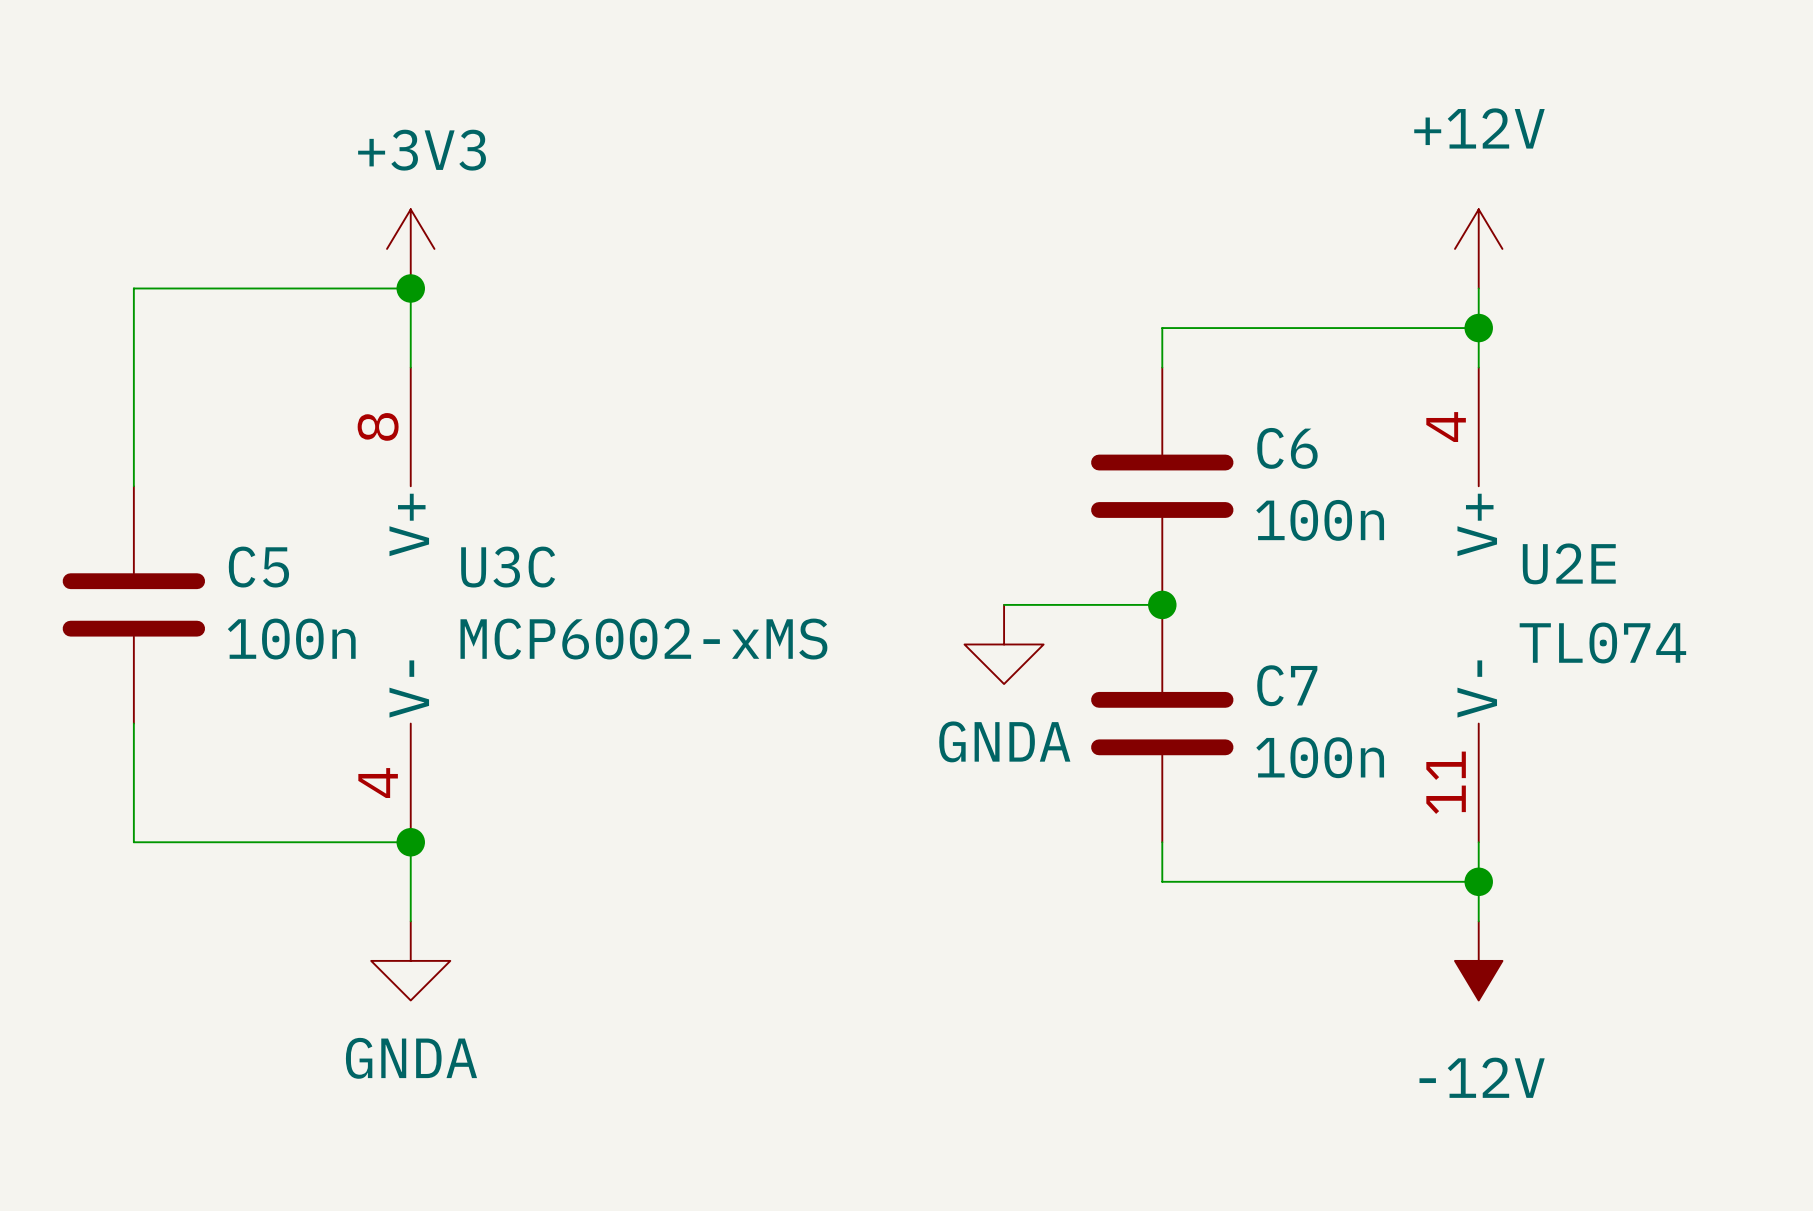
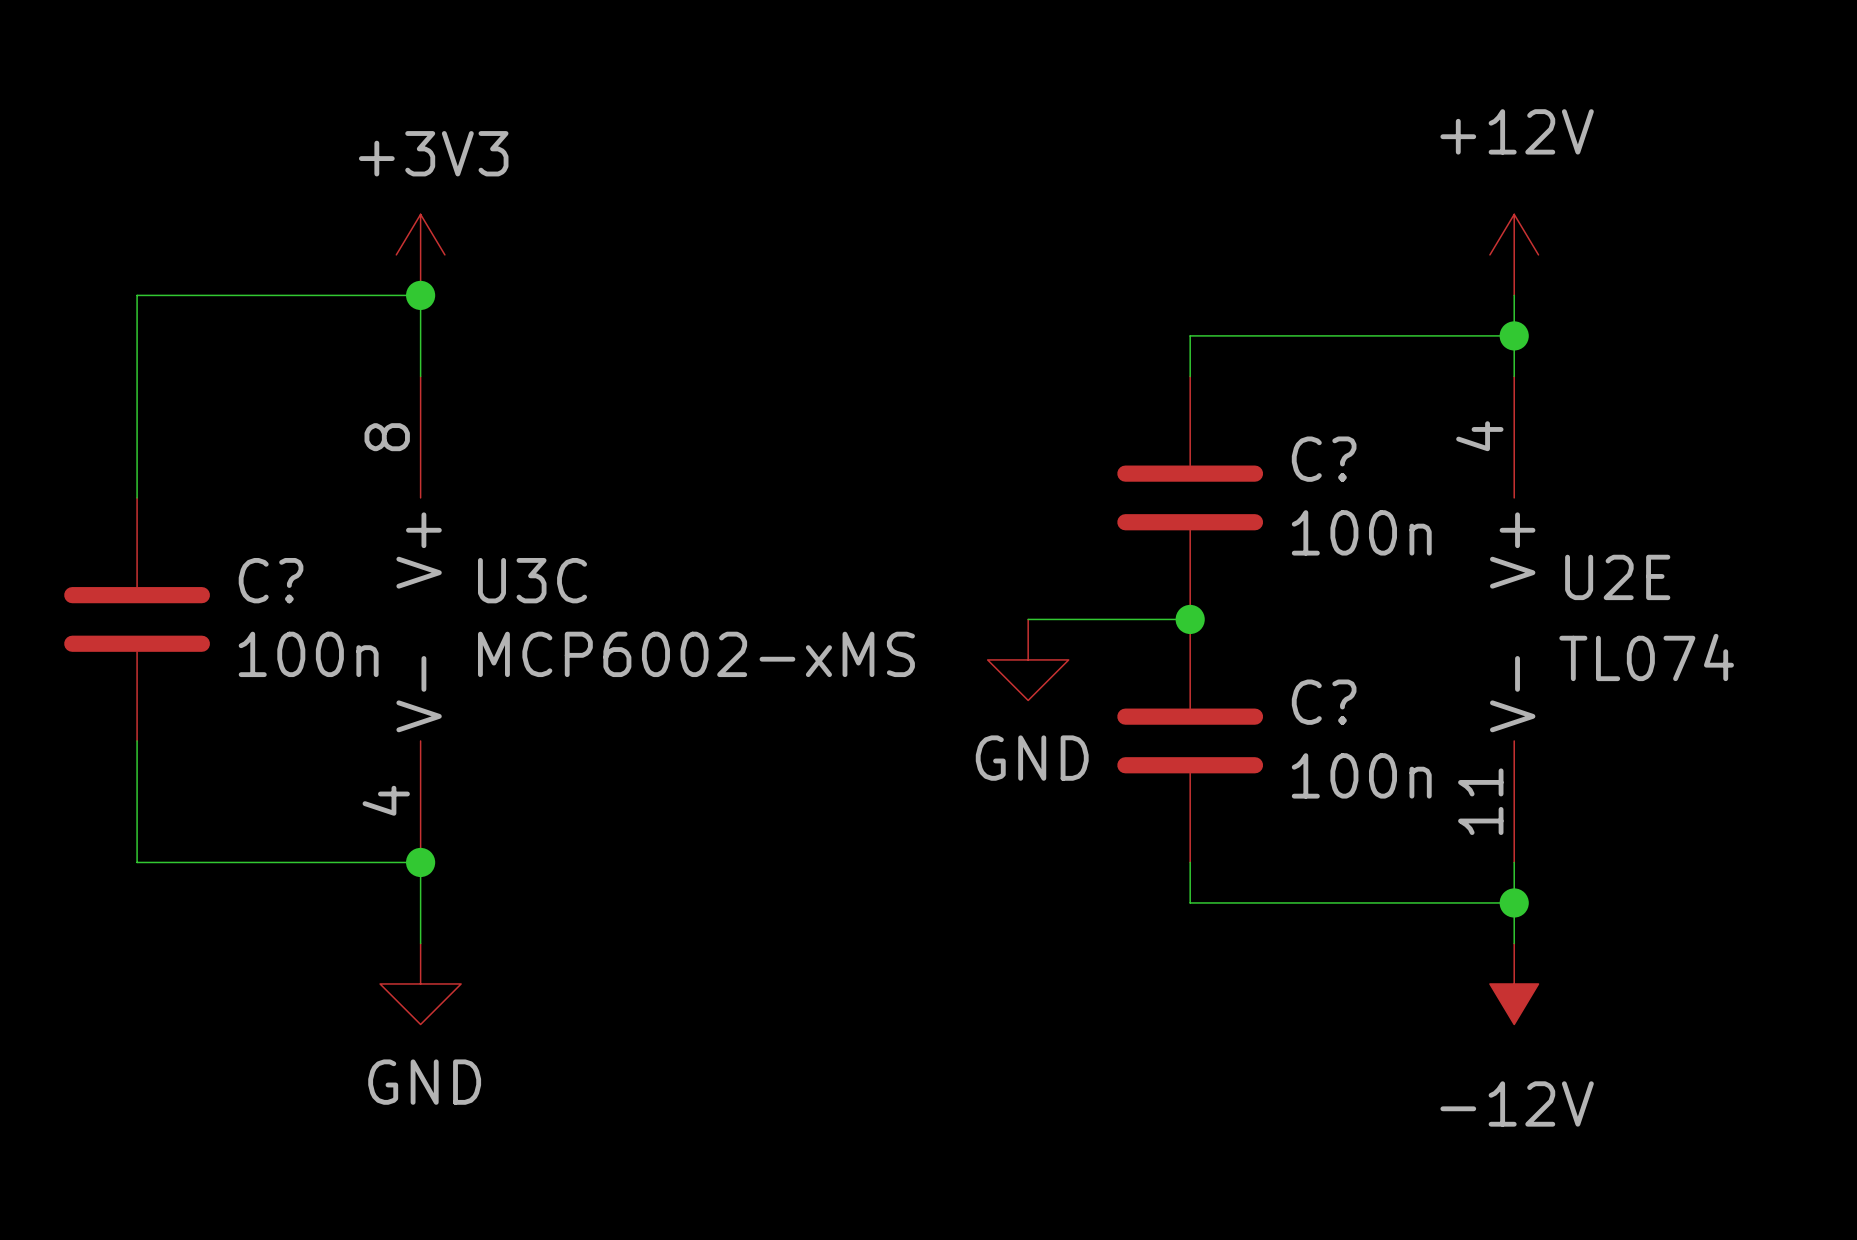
C6 name: C6 (1287, 448) -> C? (1324, 459)
C5 name: C5 (258, 567) -> C? (271, 580)
power symbol: GNDA (1004, 644) -> GND (1028, 659)
C7 name: C7 (1287, 685) -> C? (1324, 702)
power symbol: GNDA (410, 960) -> GND (420, 983)

